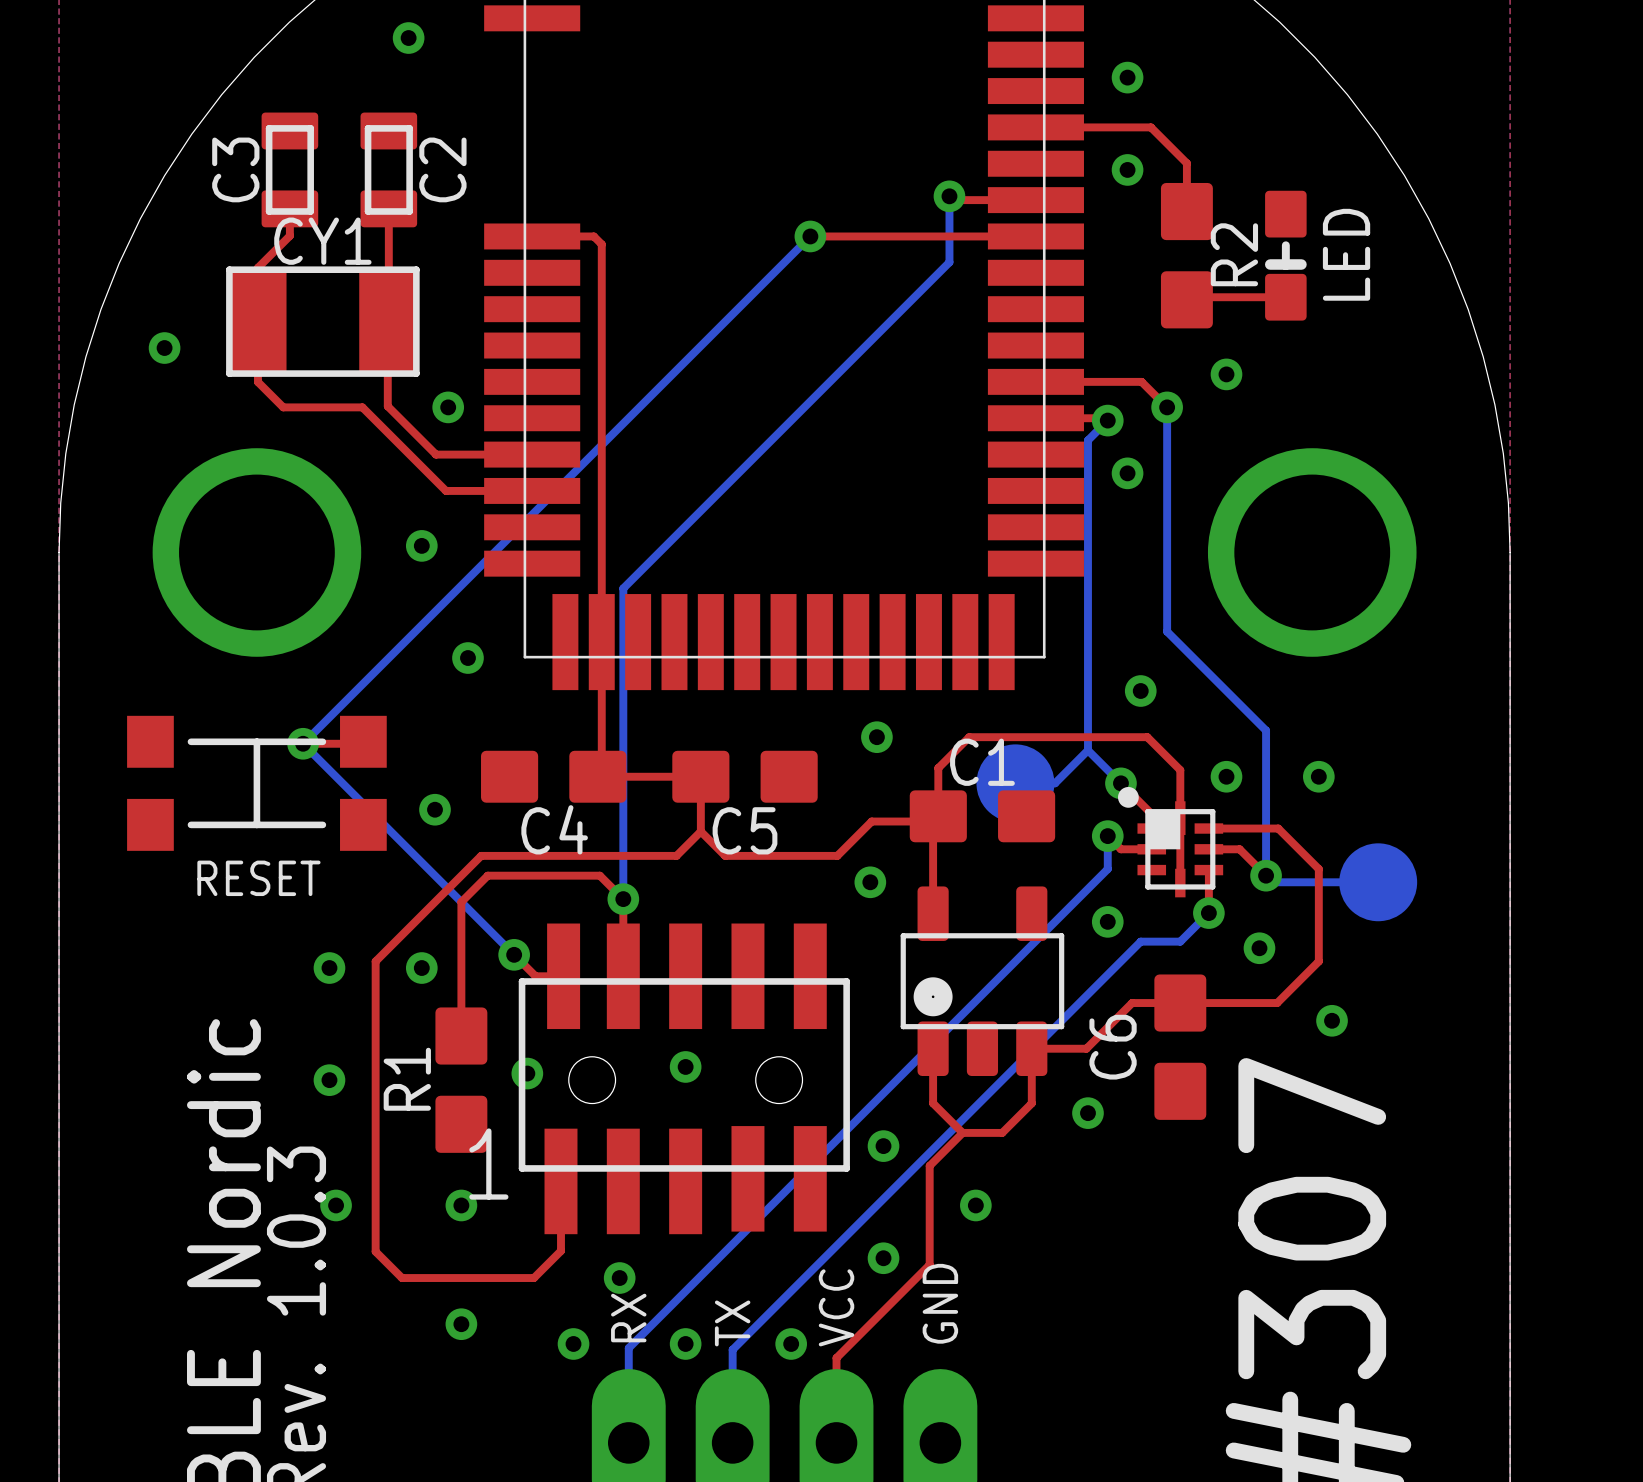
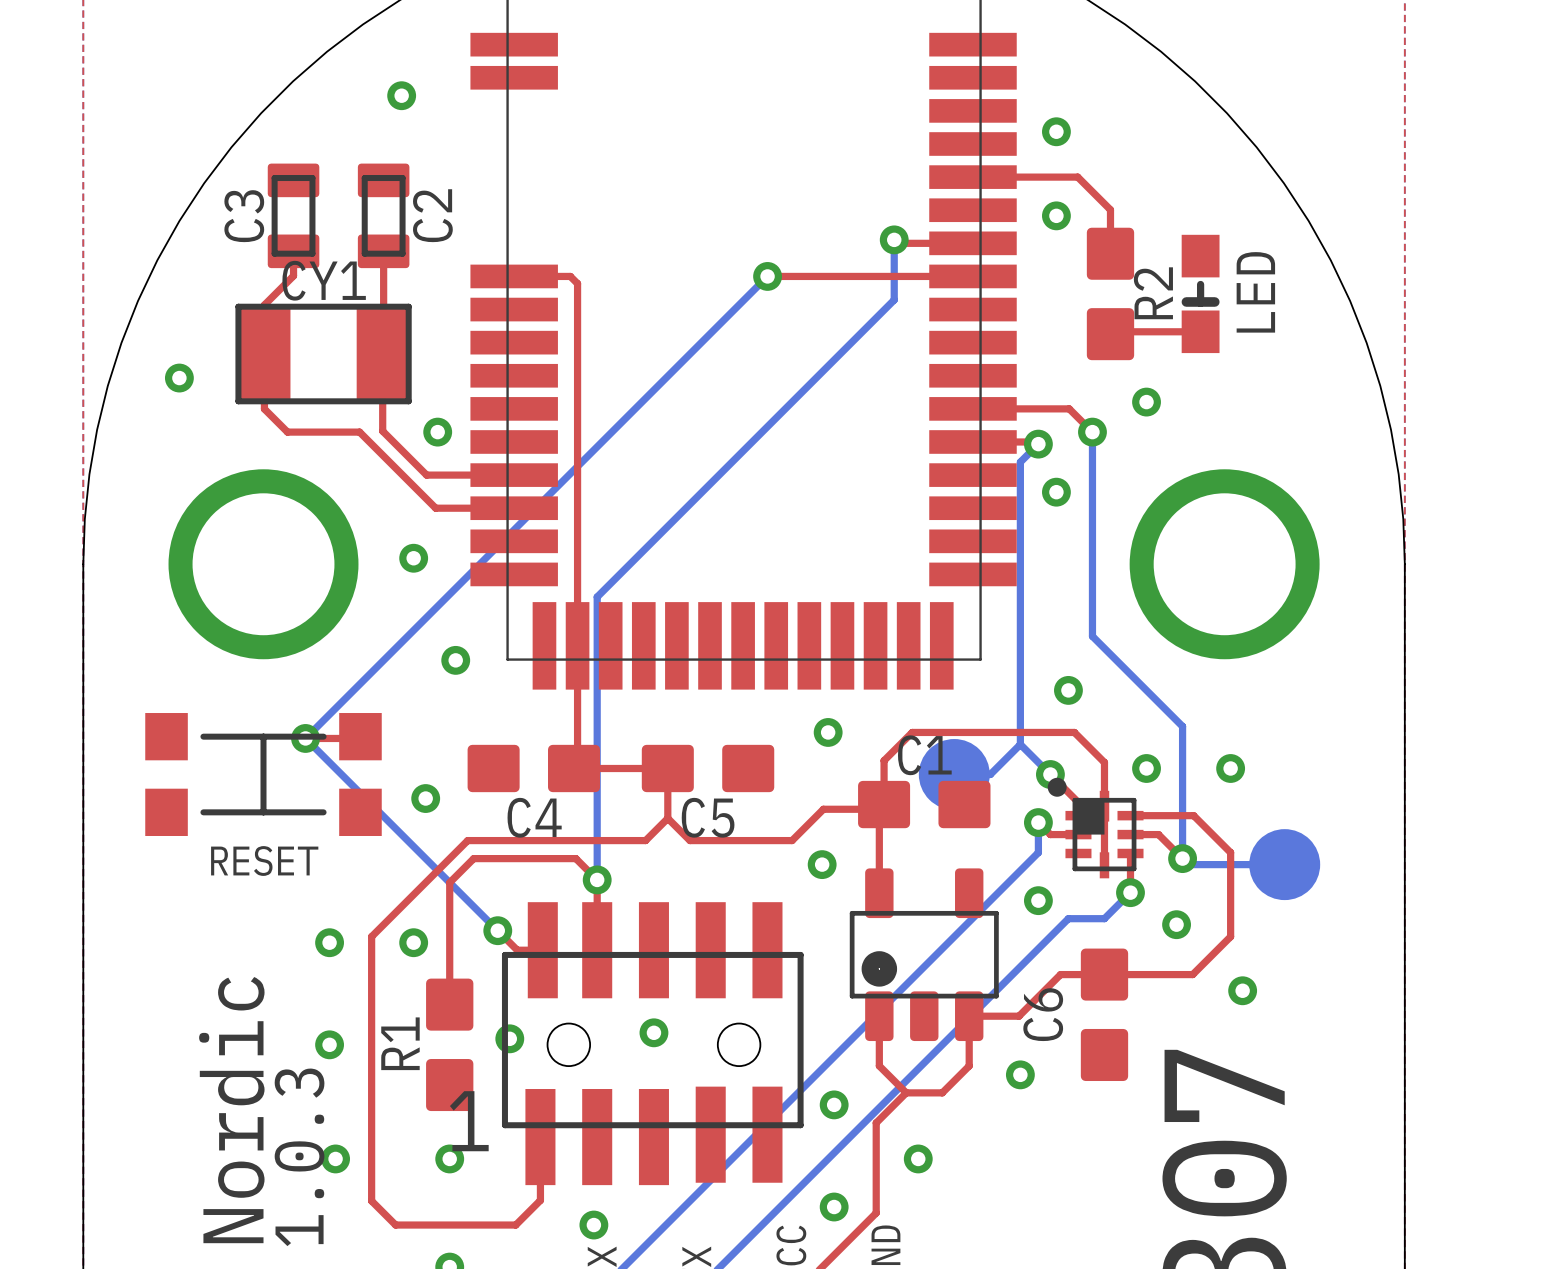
LED footprint: [1265, 190, 1307, 321] -> [1181, 234, 1220, 354]

